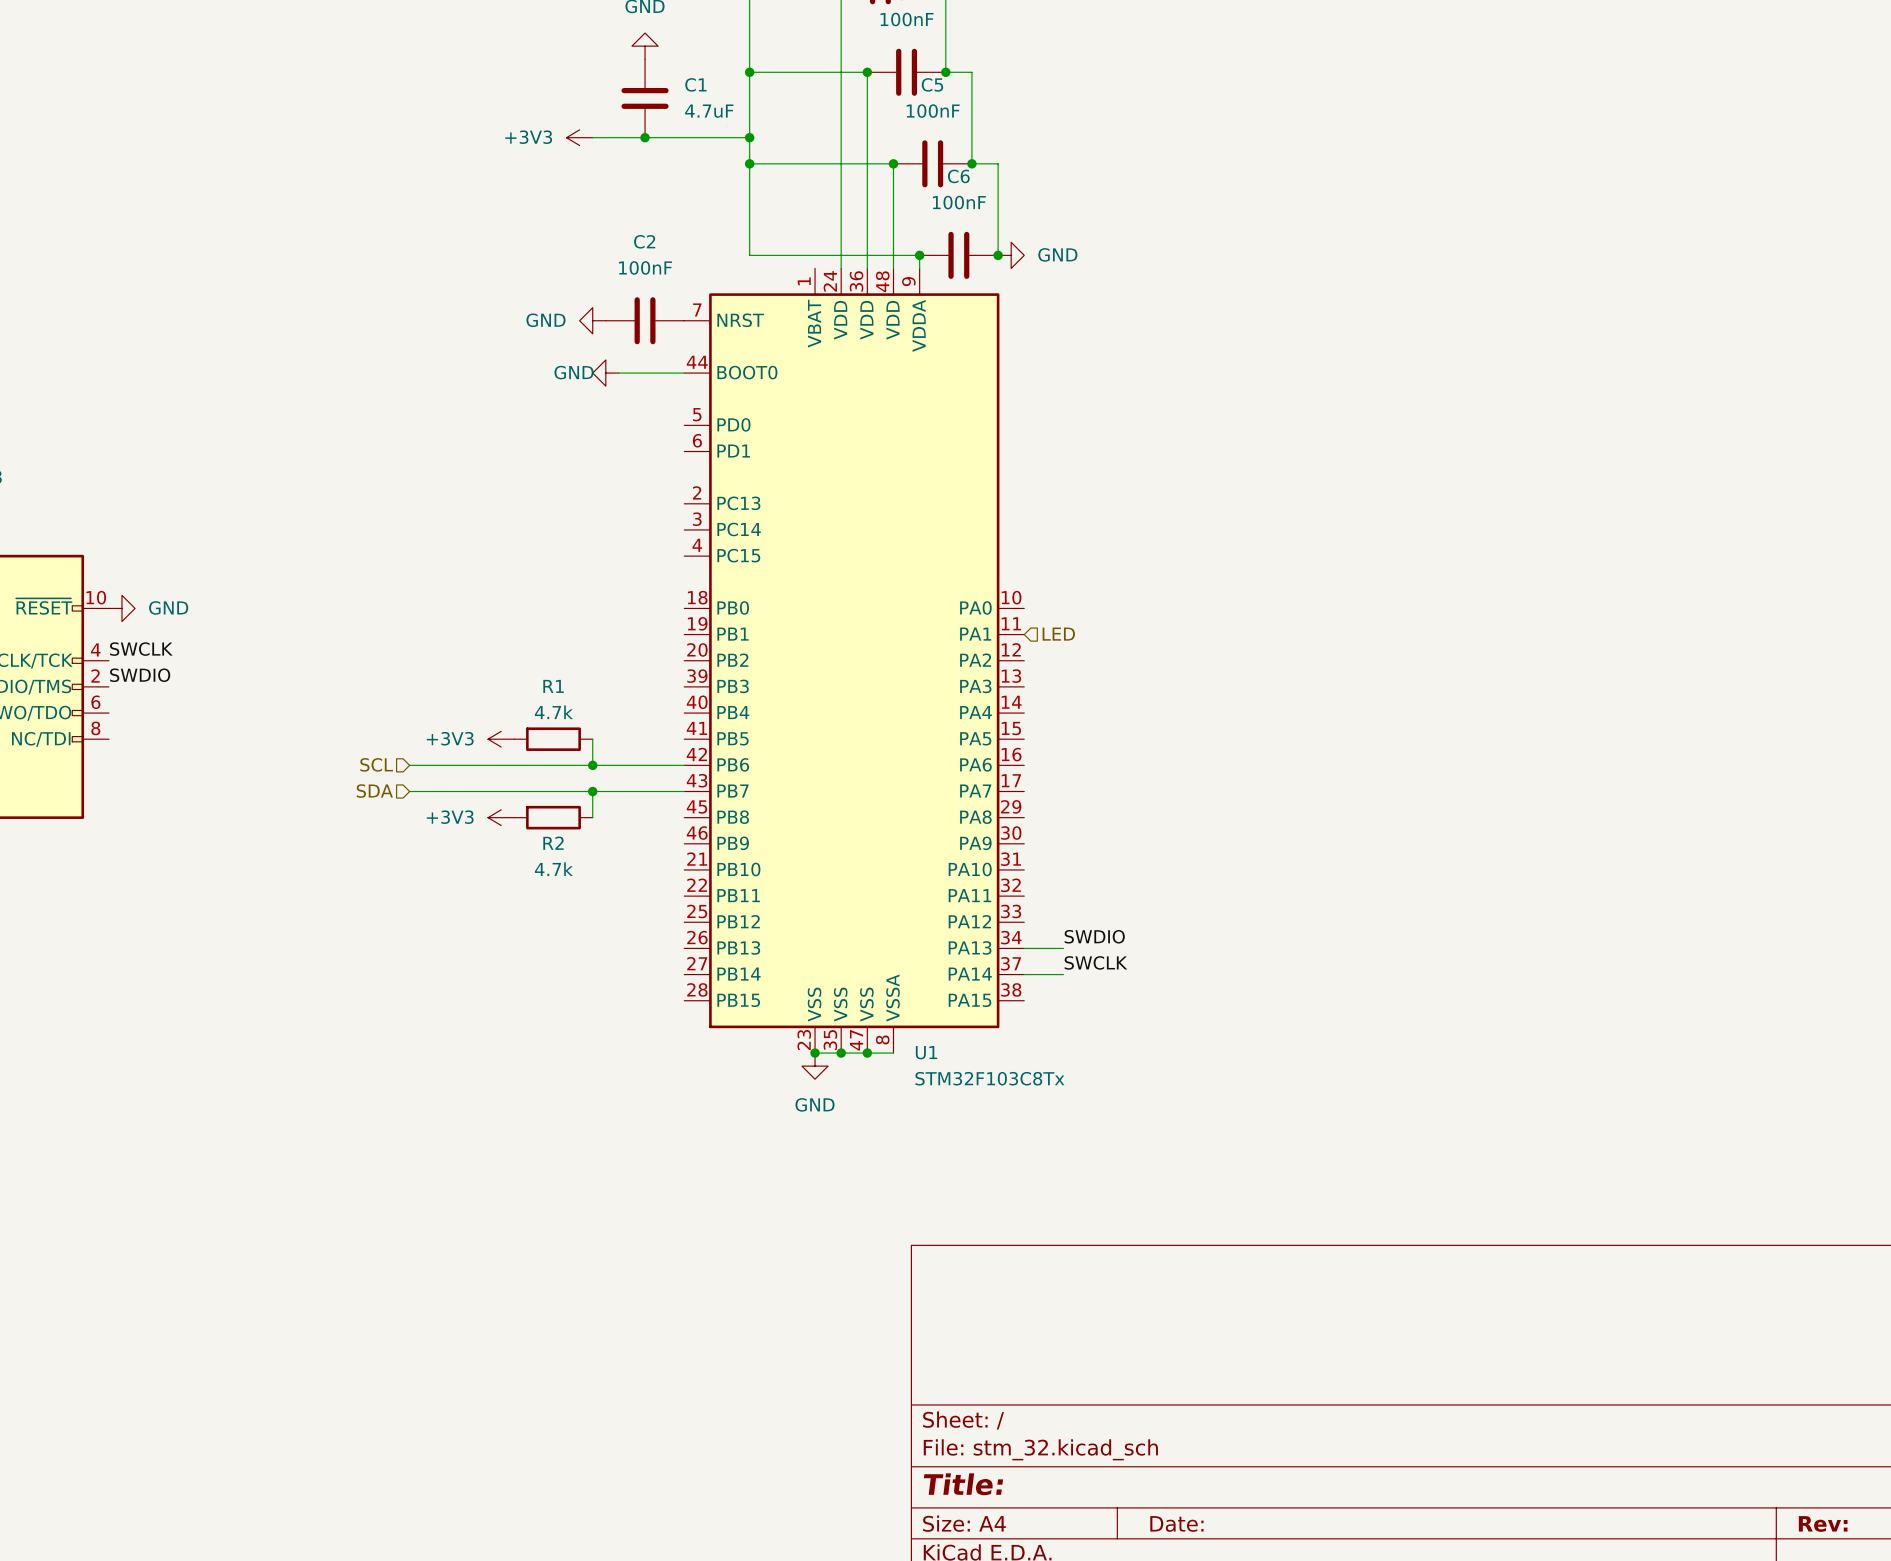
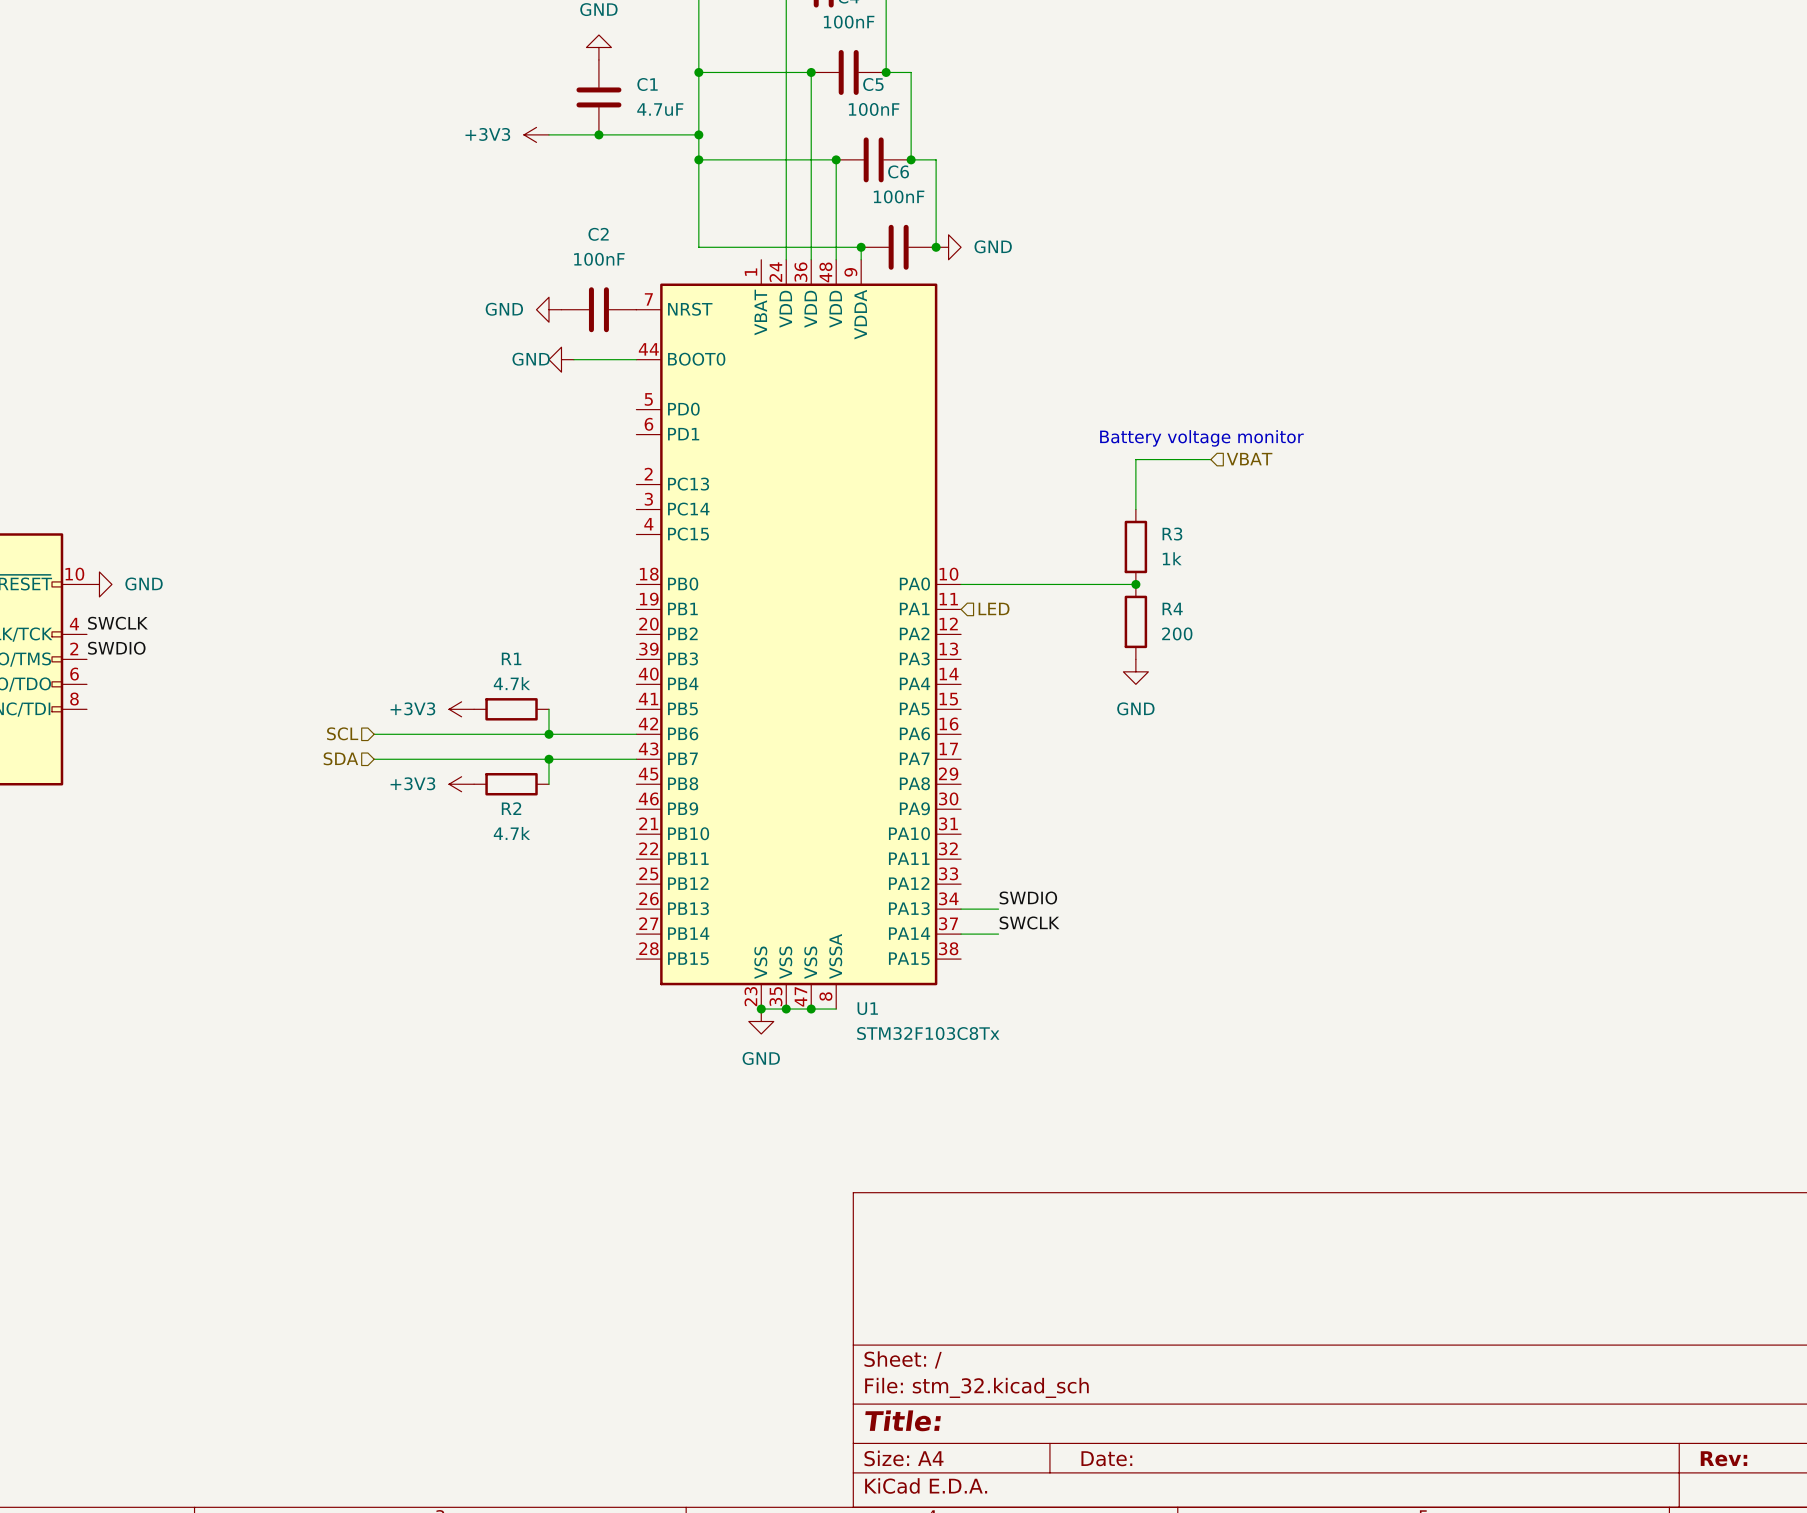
text: none -> Battery voltage monitor (1201, 438)
wire: none -> (1210, 459) (1135, 459) (1135, 509)
hierarchical label: none -> VBAT (1249, 459)
R3: none -> 1k (1135, 546)
wire: none -> (961, 584) (1135, 584)
junction: none -> (1135, 584)
R4: none -> 200 (1135, 621)
power symbol: none -> GND (1135, 671)

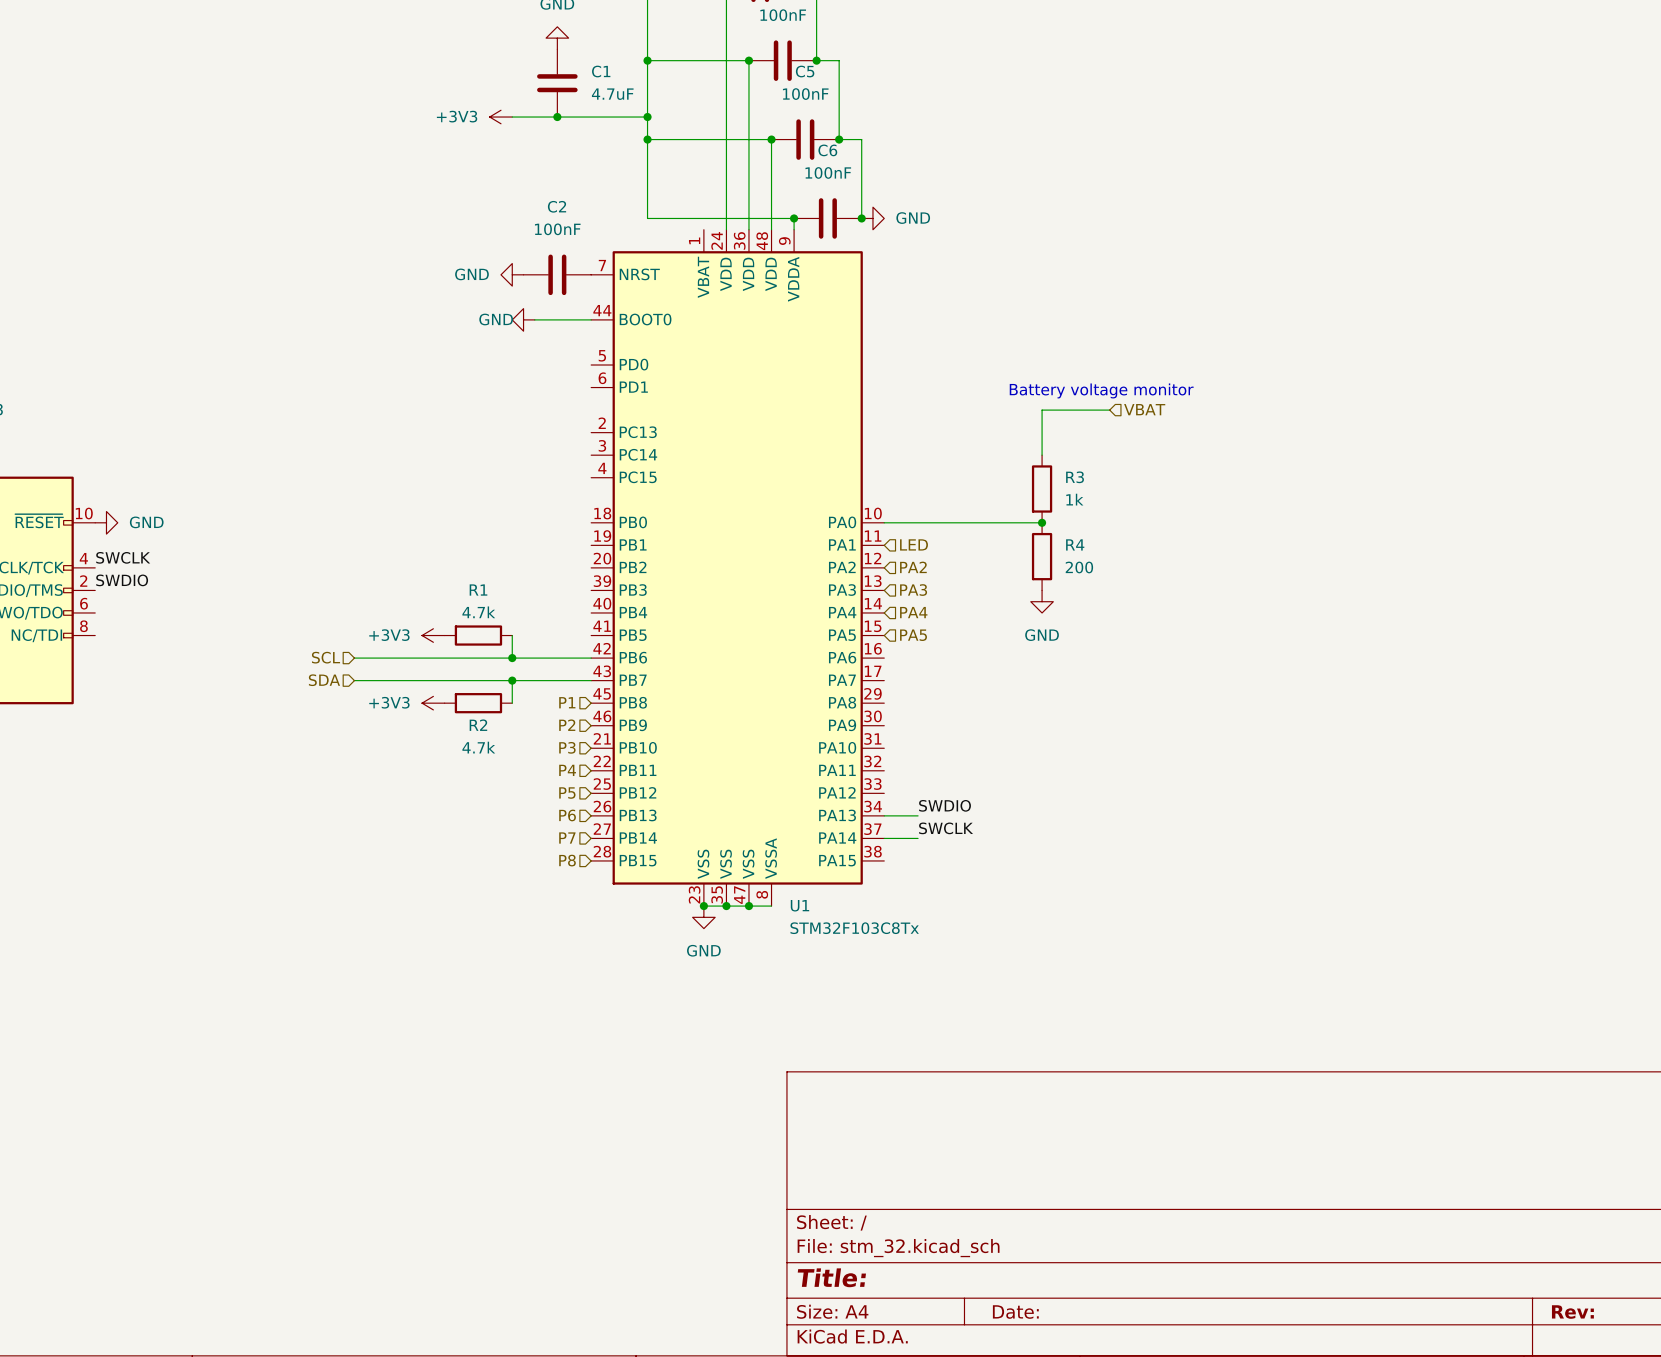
hierarchical label: none -> PA2 (913, 567)
hierarchical label: none -> PA3 (913, 590)
hierarchical label: none -> PA4 (913, 612)
hierarchical label: none -> PA5 (913, 635)
hierarchical label: none -> P1 (567, 702)
hierarchical label: none -> P2 (567, 725)
hierarchical label: none -> P3 (567, 747)
hierarchical label: none -> P4 (567, 770)
hierarchical label: none -> P5 (567, 793)
hierarchical label: none -> P6 (567, 815)
hierarchical label: none -> P7 (567, 838)
hierarchical label: none -> P8 (567, 860)

